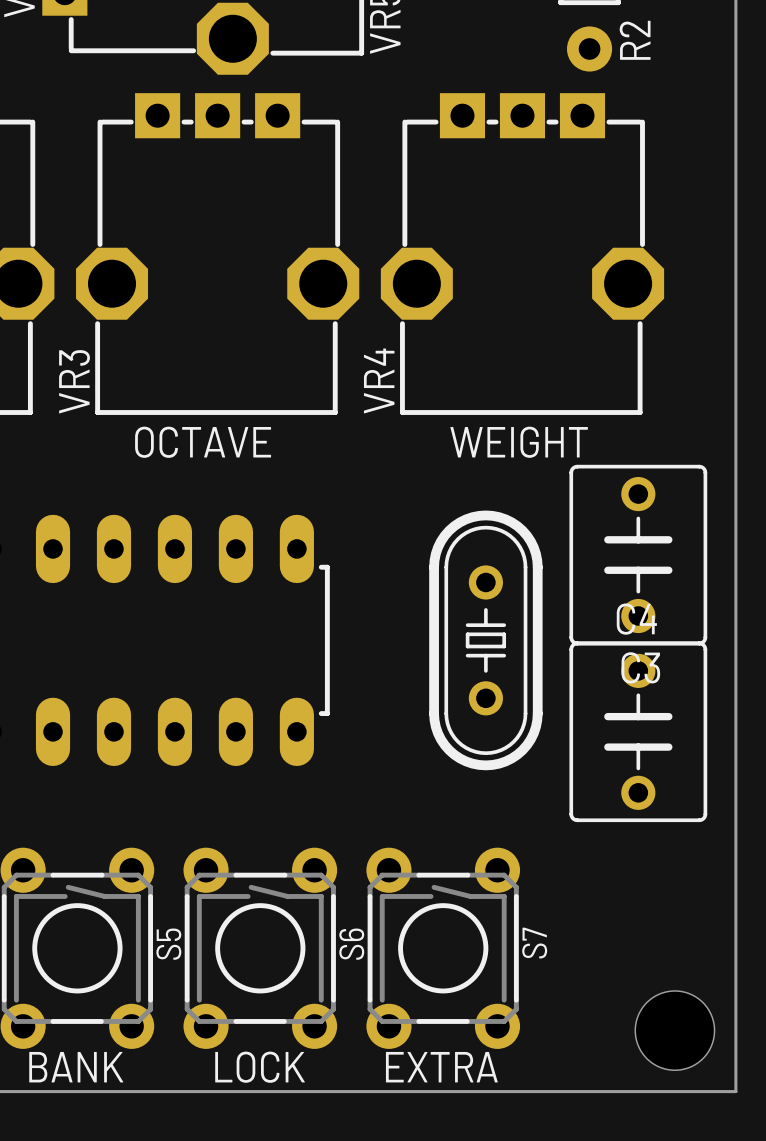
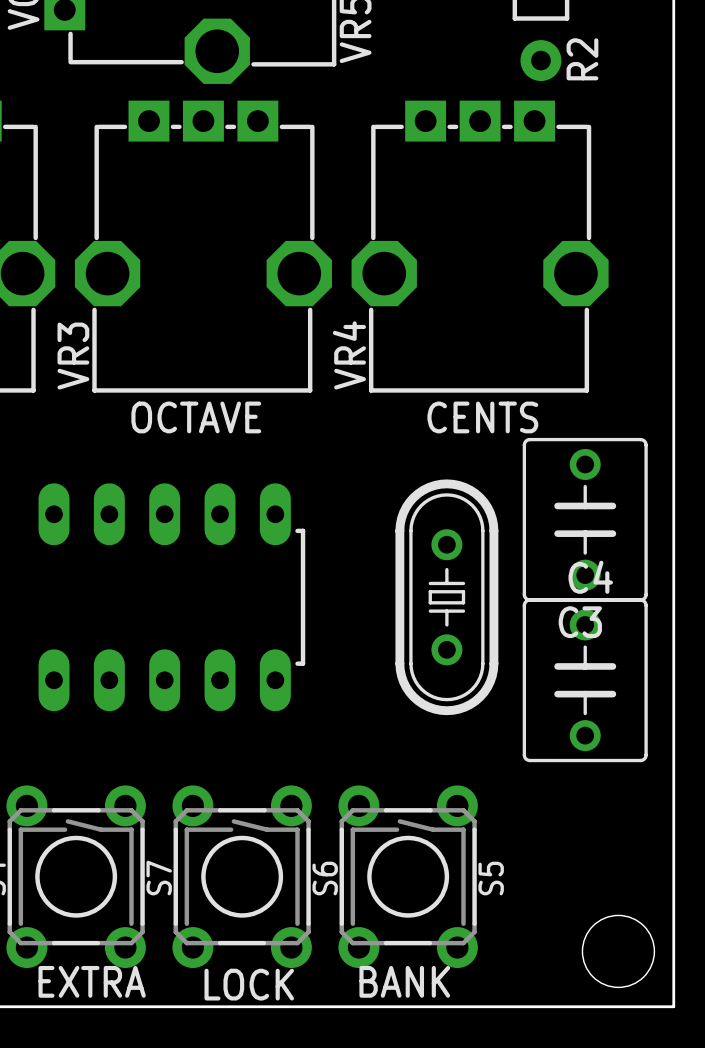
text: WEIGHT (519, 442) -> CENTS (482, 417)
S7 name: S7 (534, 943) -> S5 (491, 878)
S5 name: S5 (168, 944) -> S7 (159, 878)
text: BANK (76, 1067) -> EXTRA (92, 981)
text: EXTRA (441, 1067) -> BANK (404, 981)

